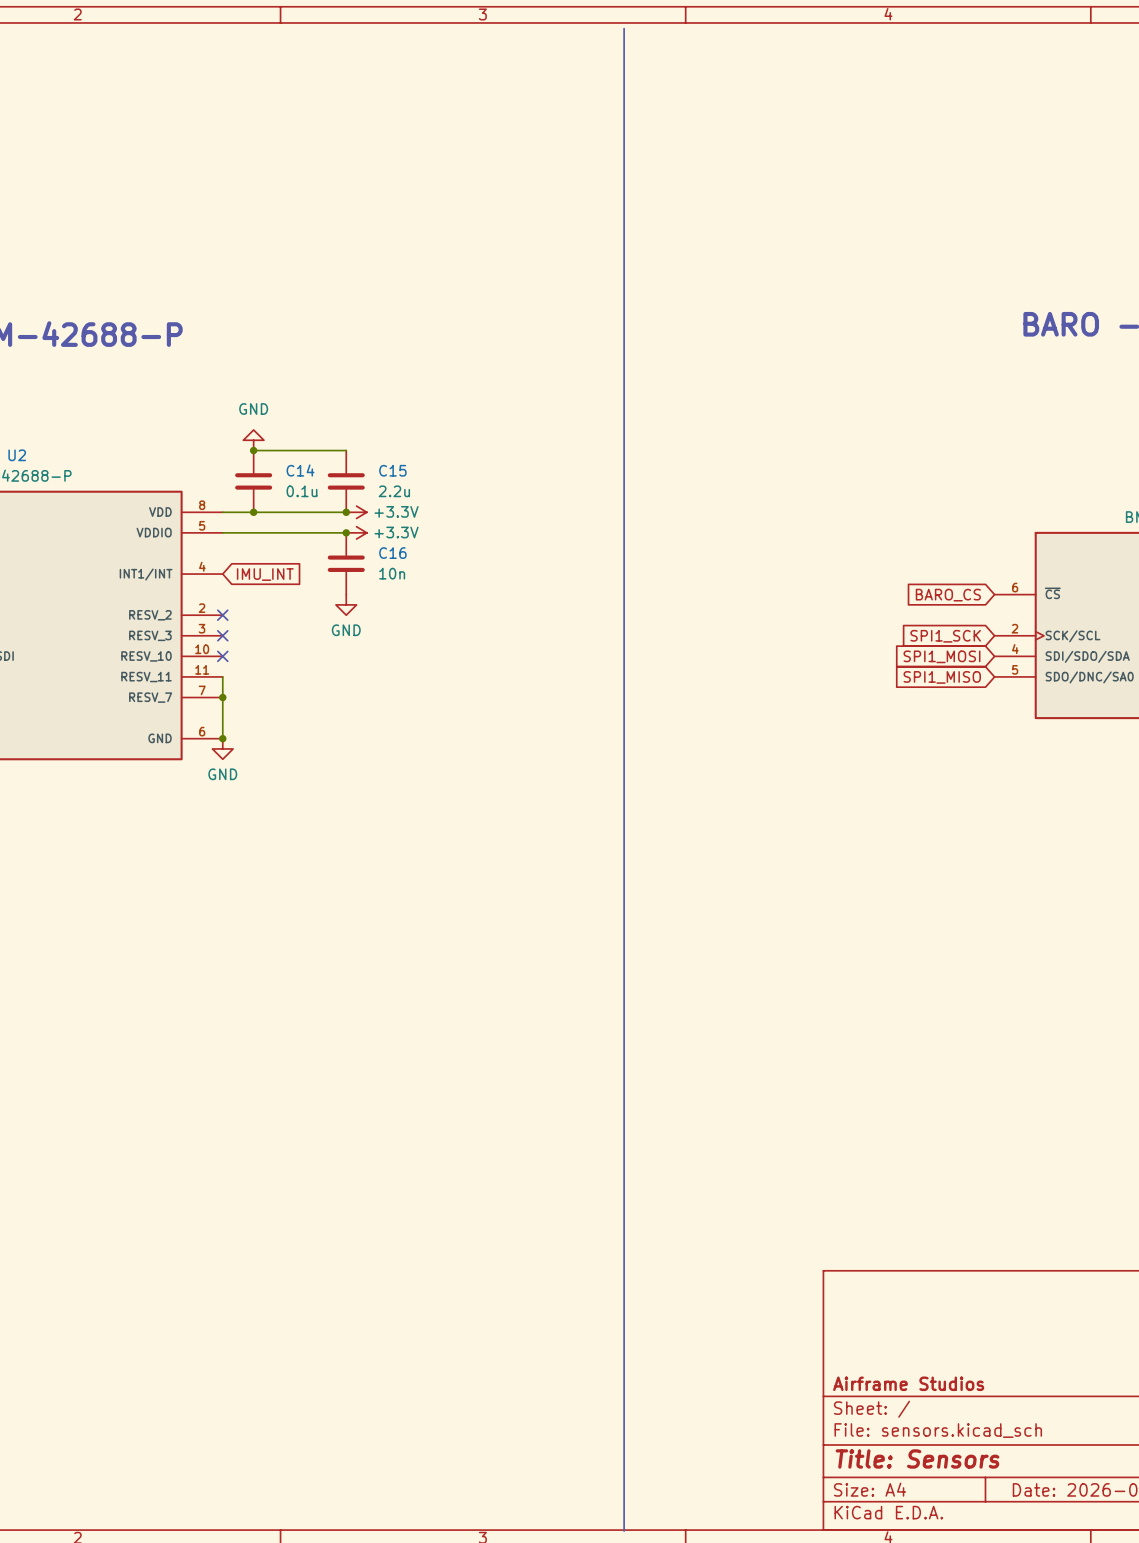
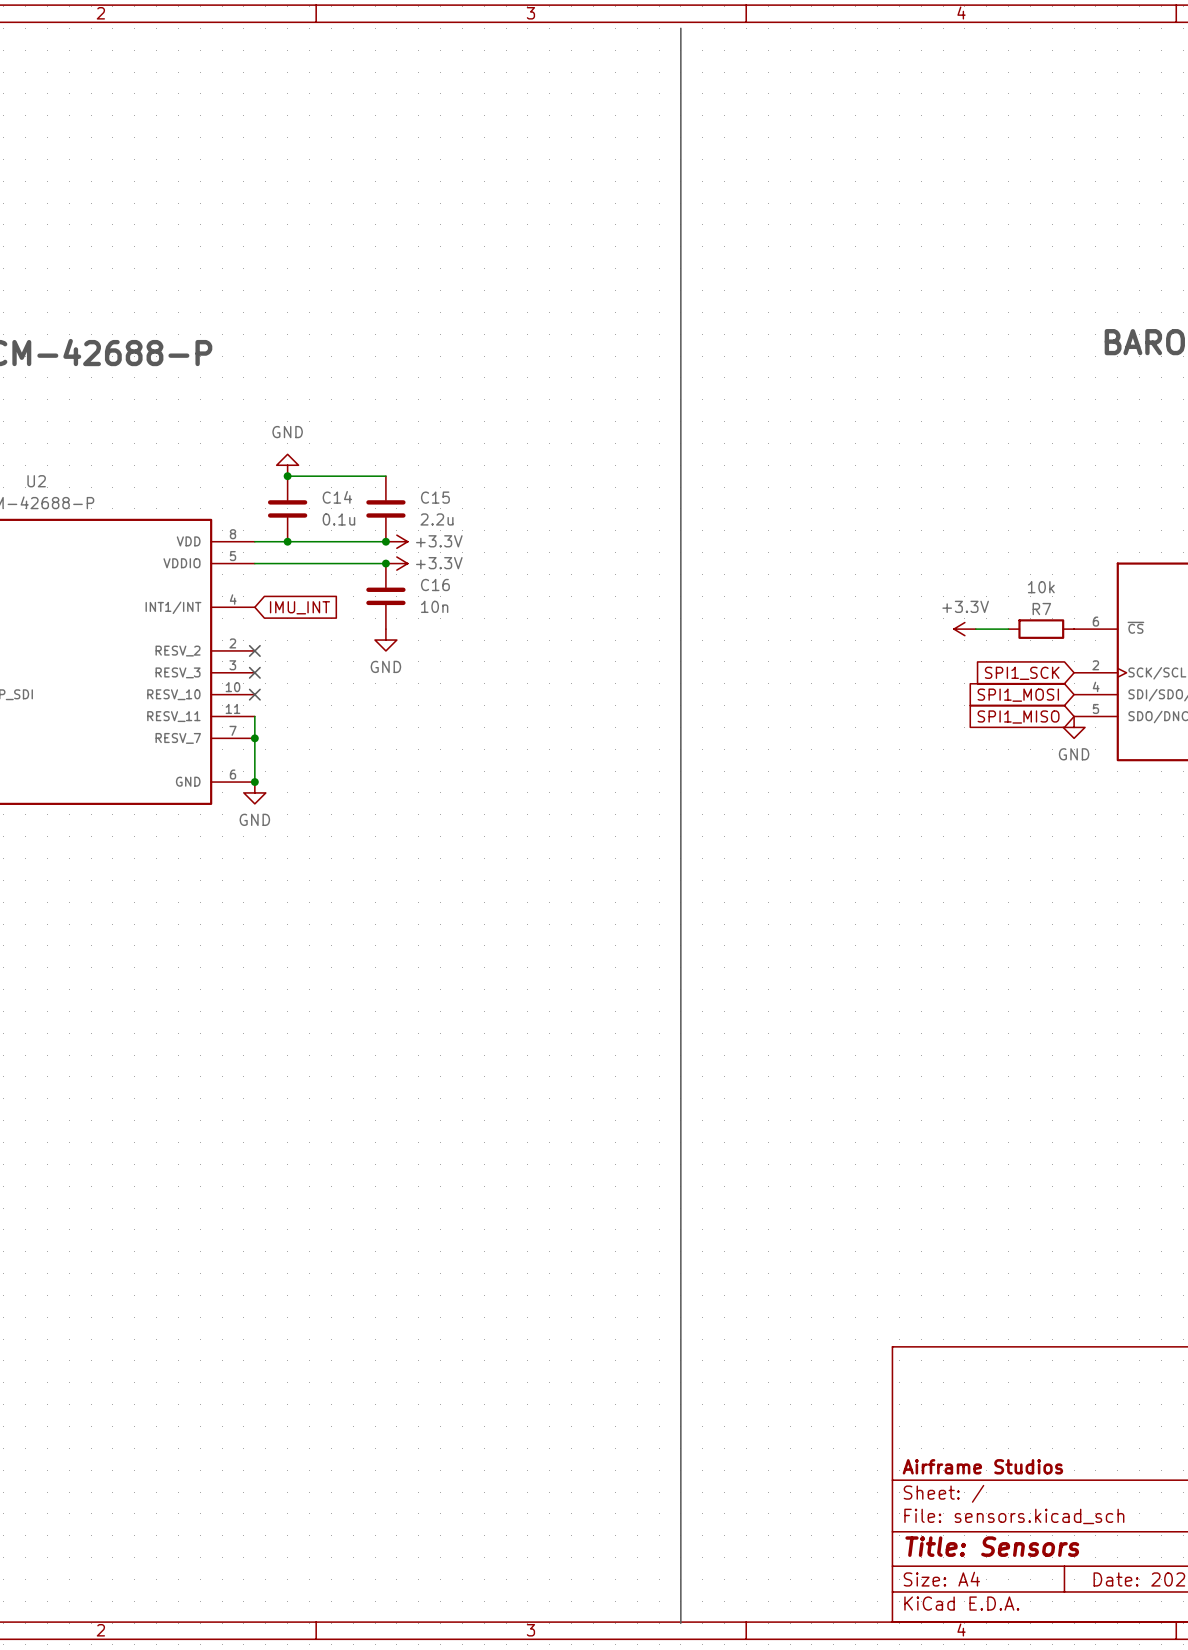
power symbol: none -> +3.3V (964, 629)
wire: none -> (975, 629) (1008, 629)
R7: none -> 10k (1041, 629)
global label: BARO_CS (948, 595) -> none
power symbol: none -> GND (1074, 727)

